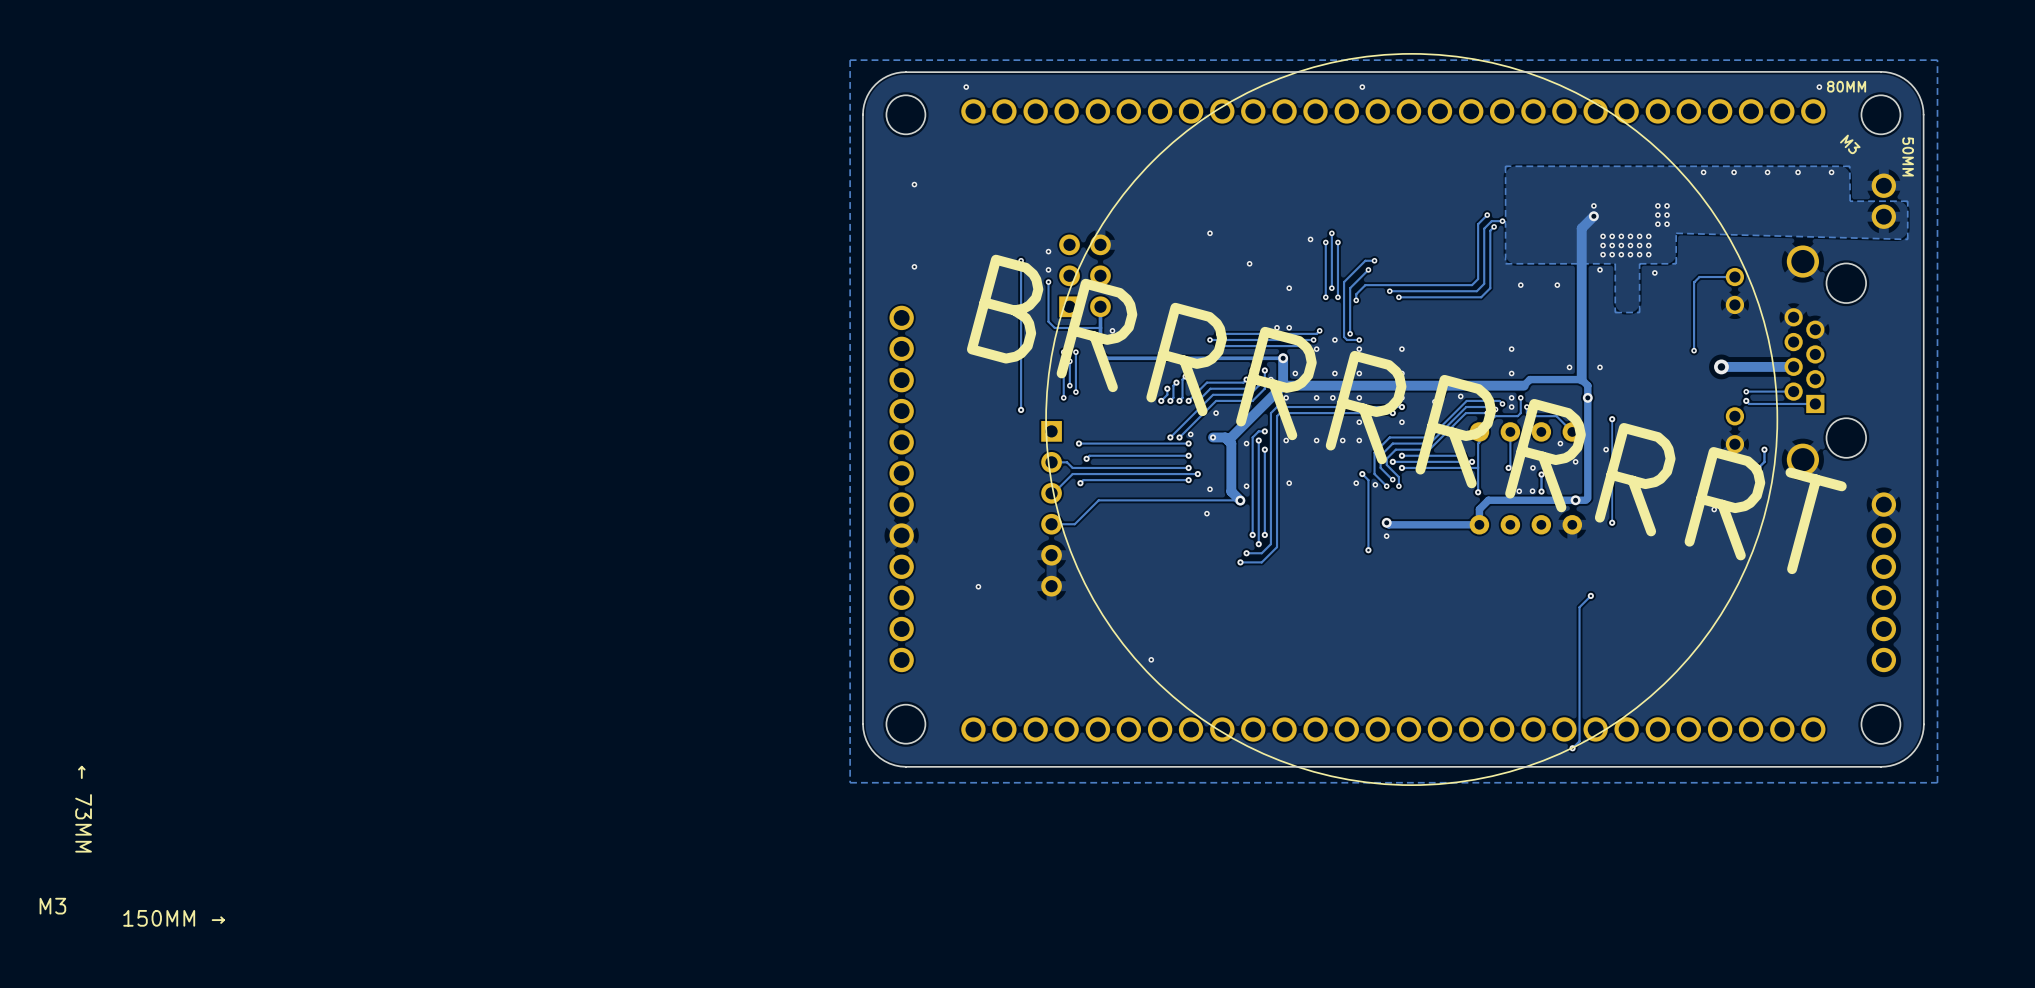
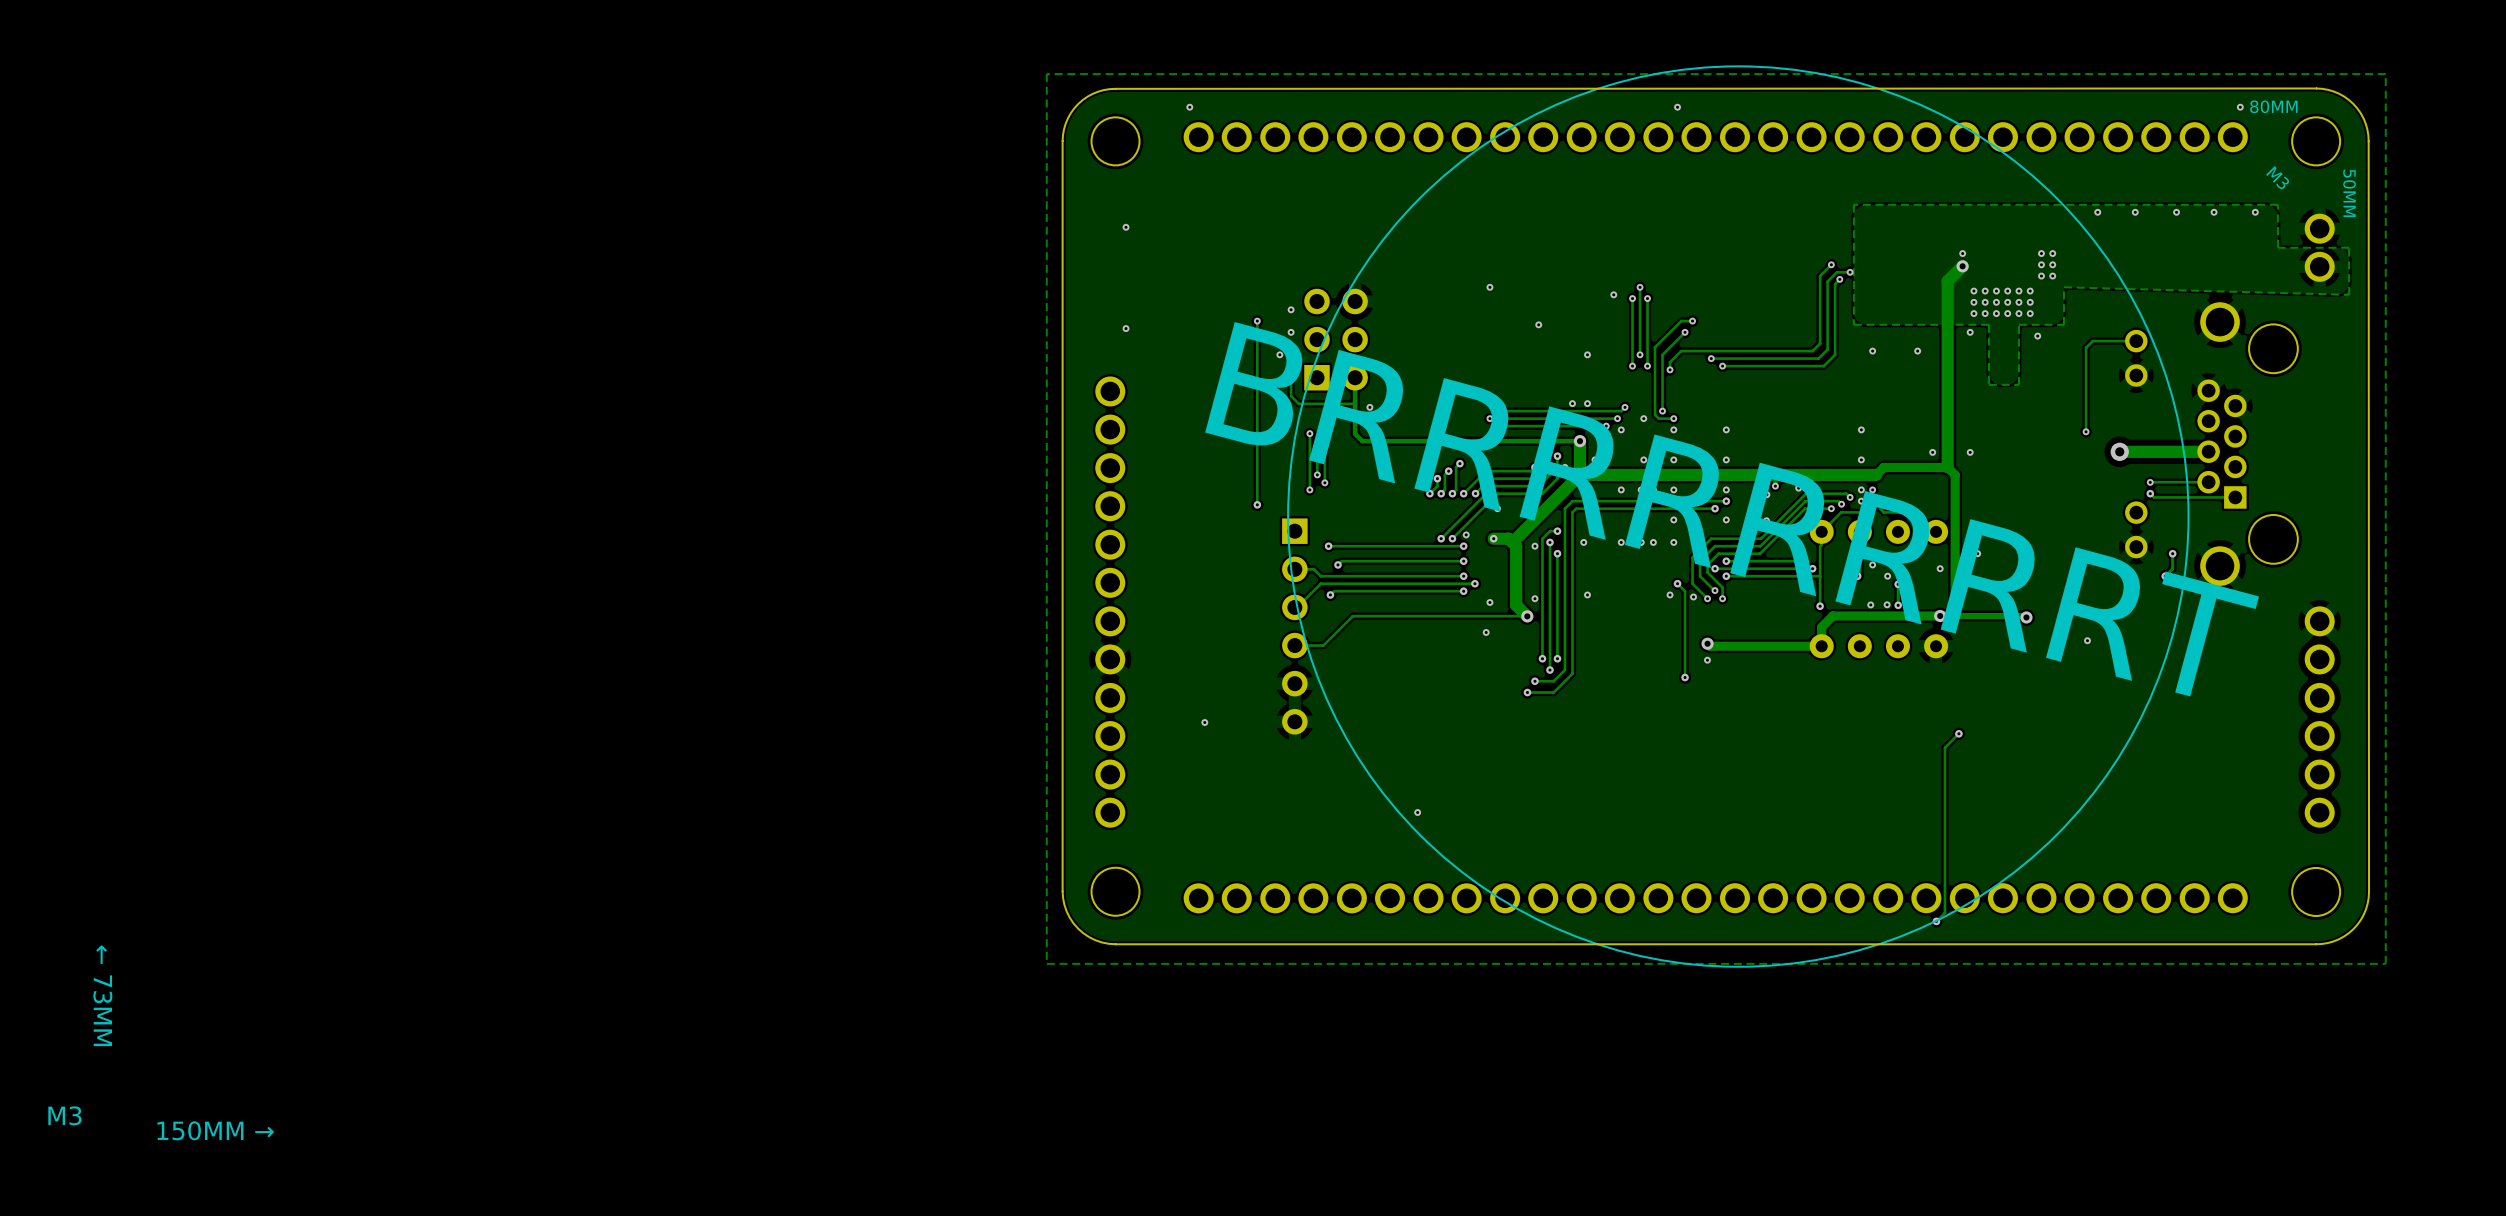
via: (1587, 397) -> none
track: (1612, 419) (1612, 522) -> none
via: (1612, 419) -> none
track: none -> (1952, 616) (2026, 617)
via: none -> (2026, 617)
via: (1612, 522) -> none

